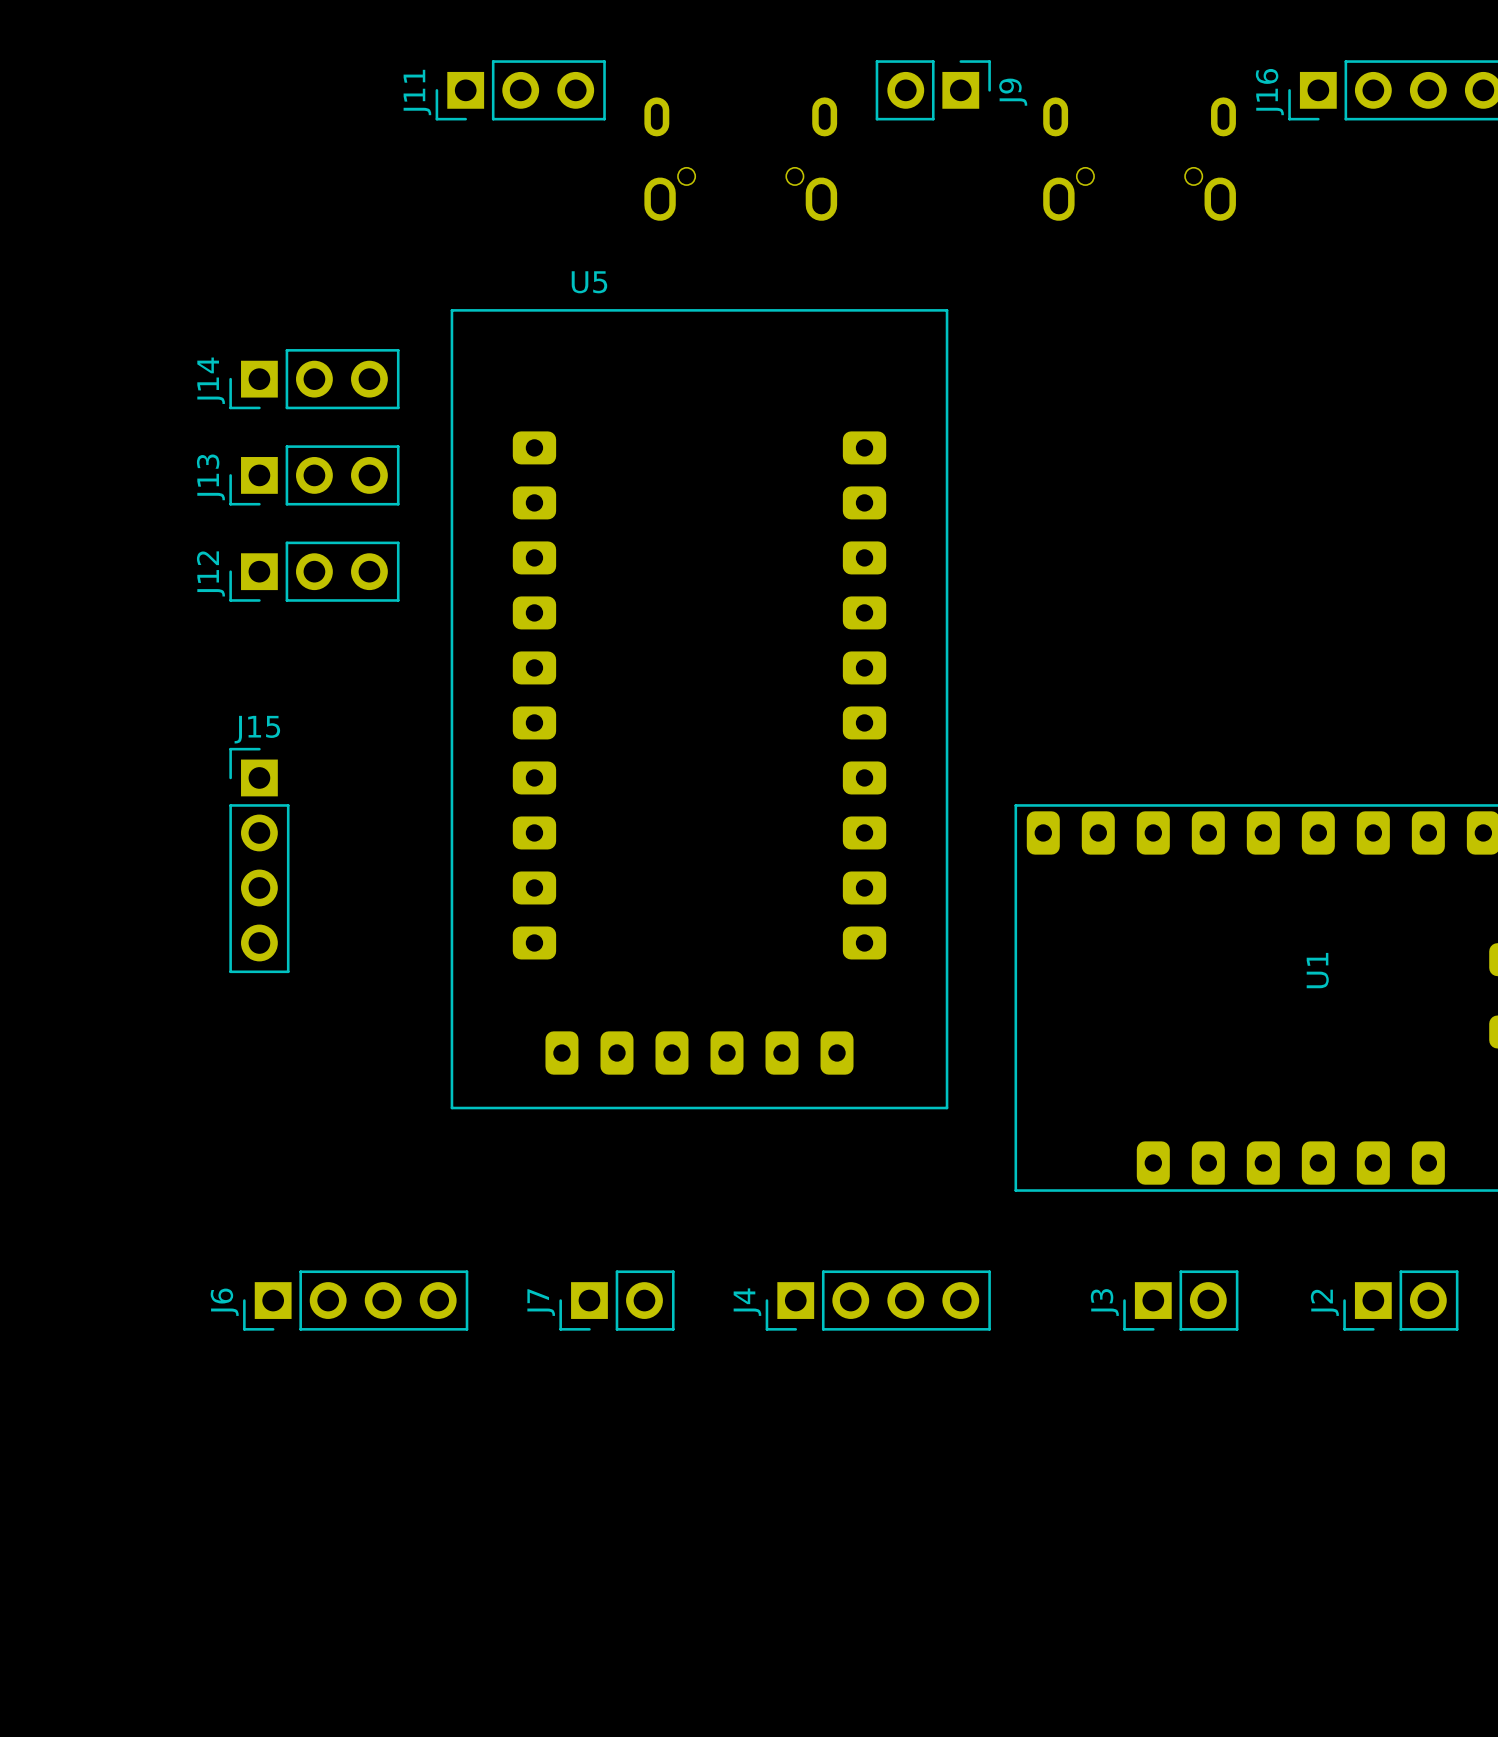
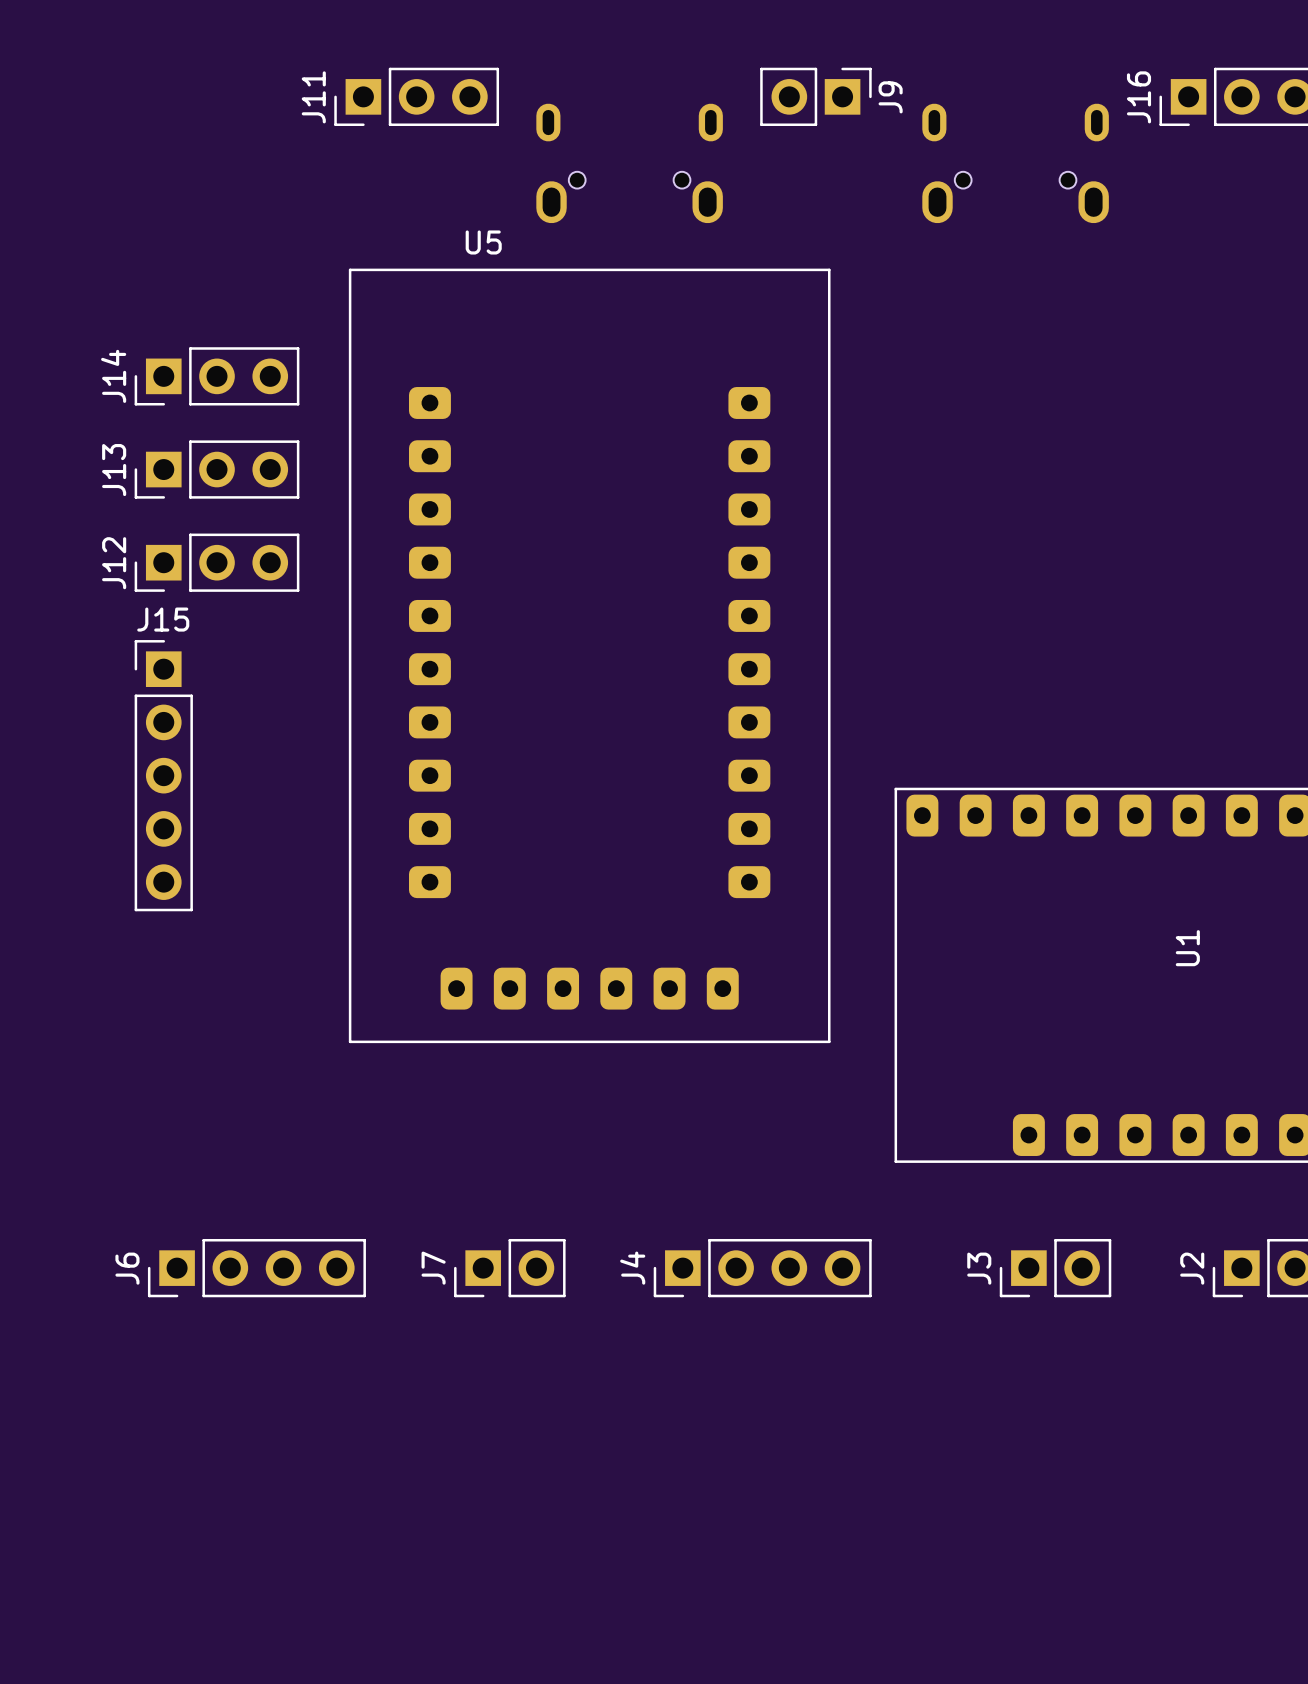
U5 position: (699, 709) -> (589, 655)
J15 footprint: [229, 747, 290, 974] -> [134, 640, 193, 912]

